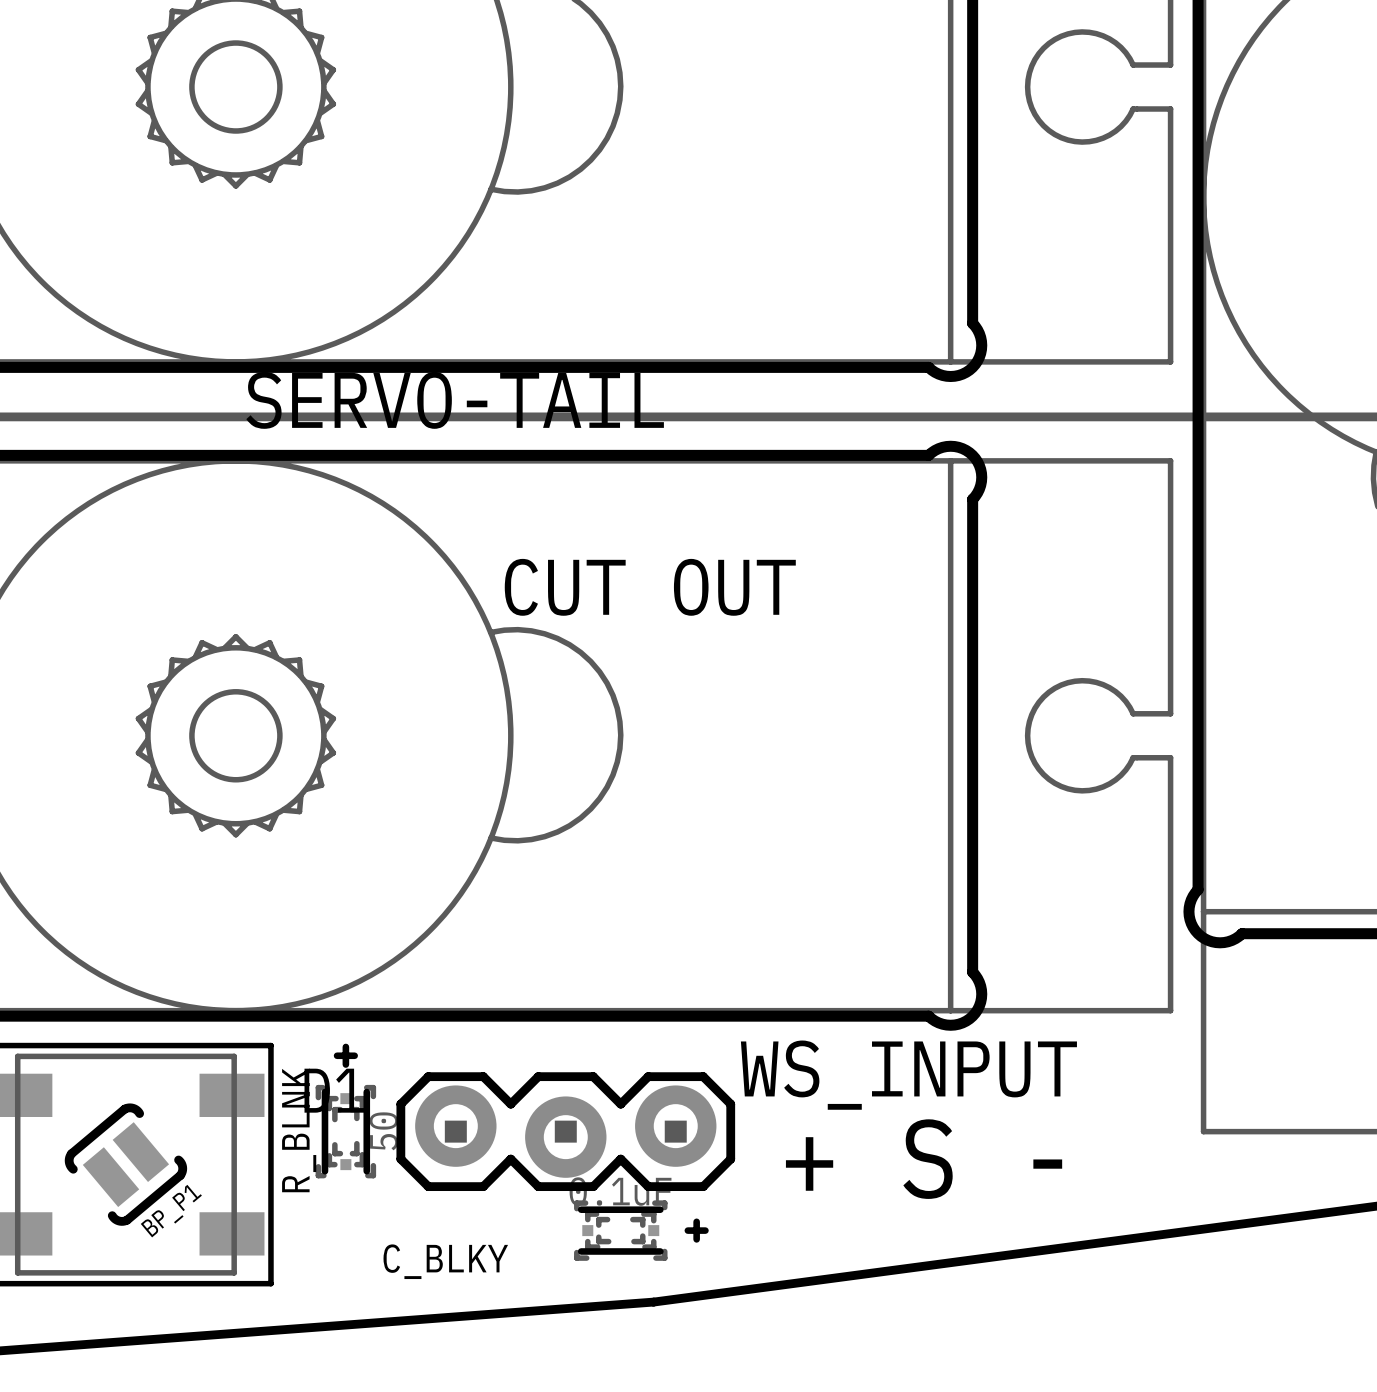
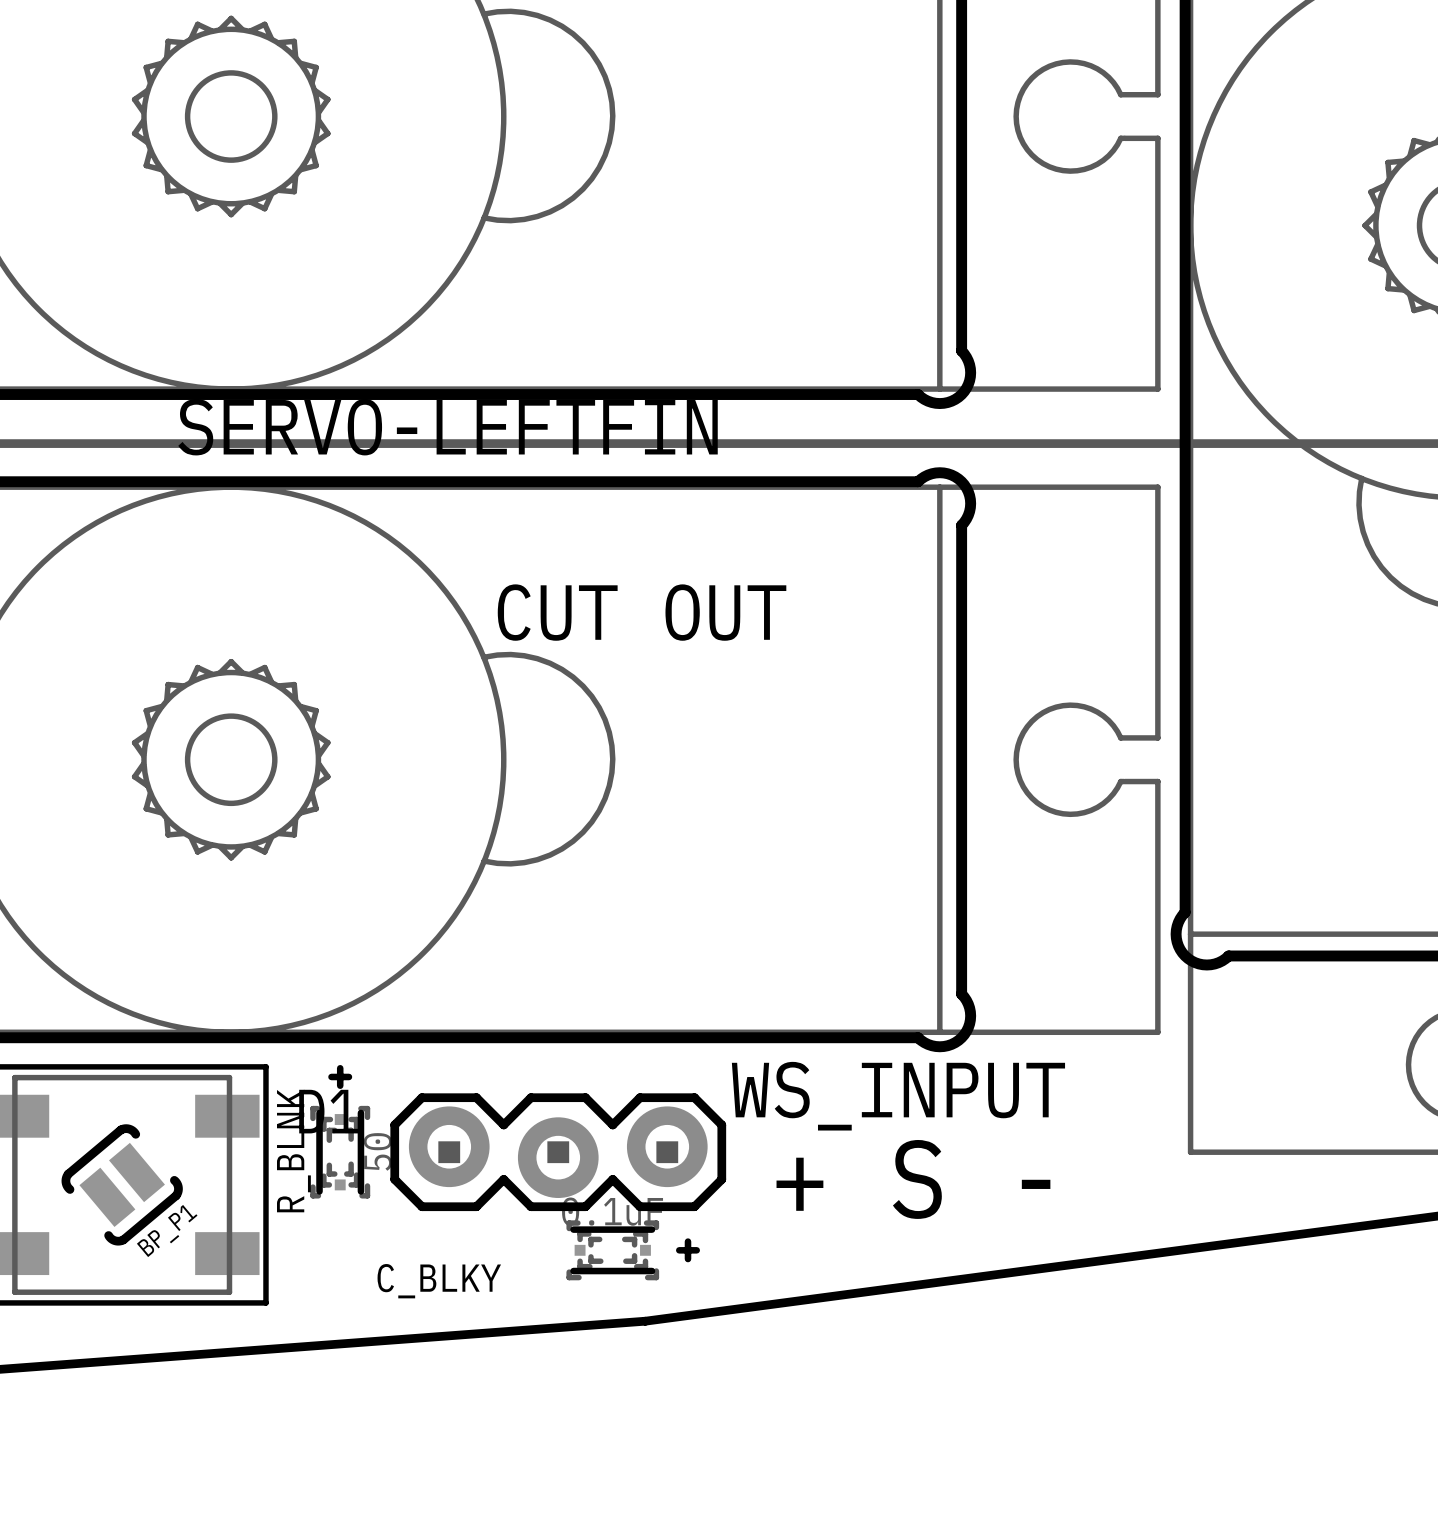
SERVO-TAIL name: SERVO-TAIL (455, 400) -> SERVO-LEFTFIN (448, 427)

